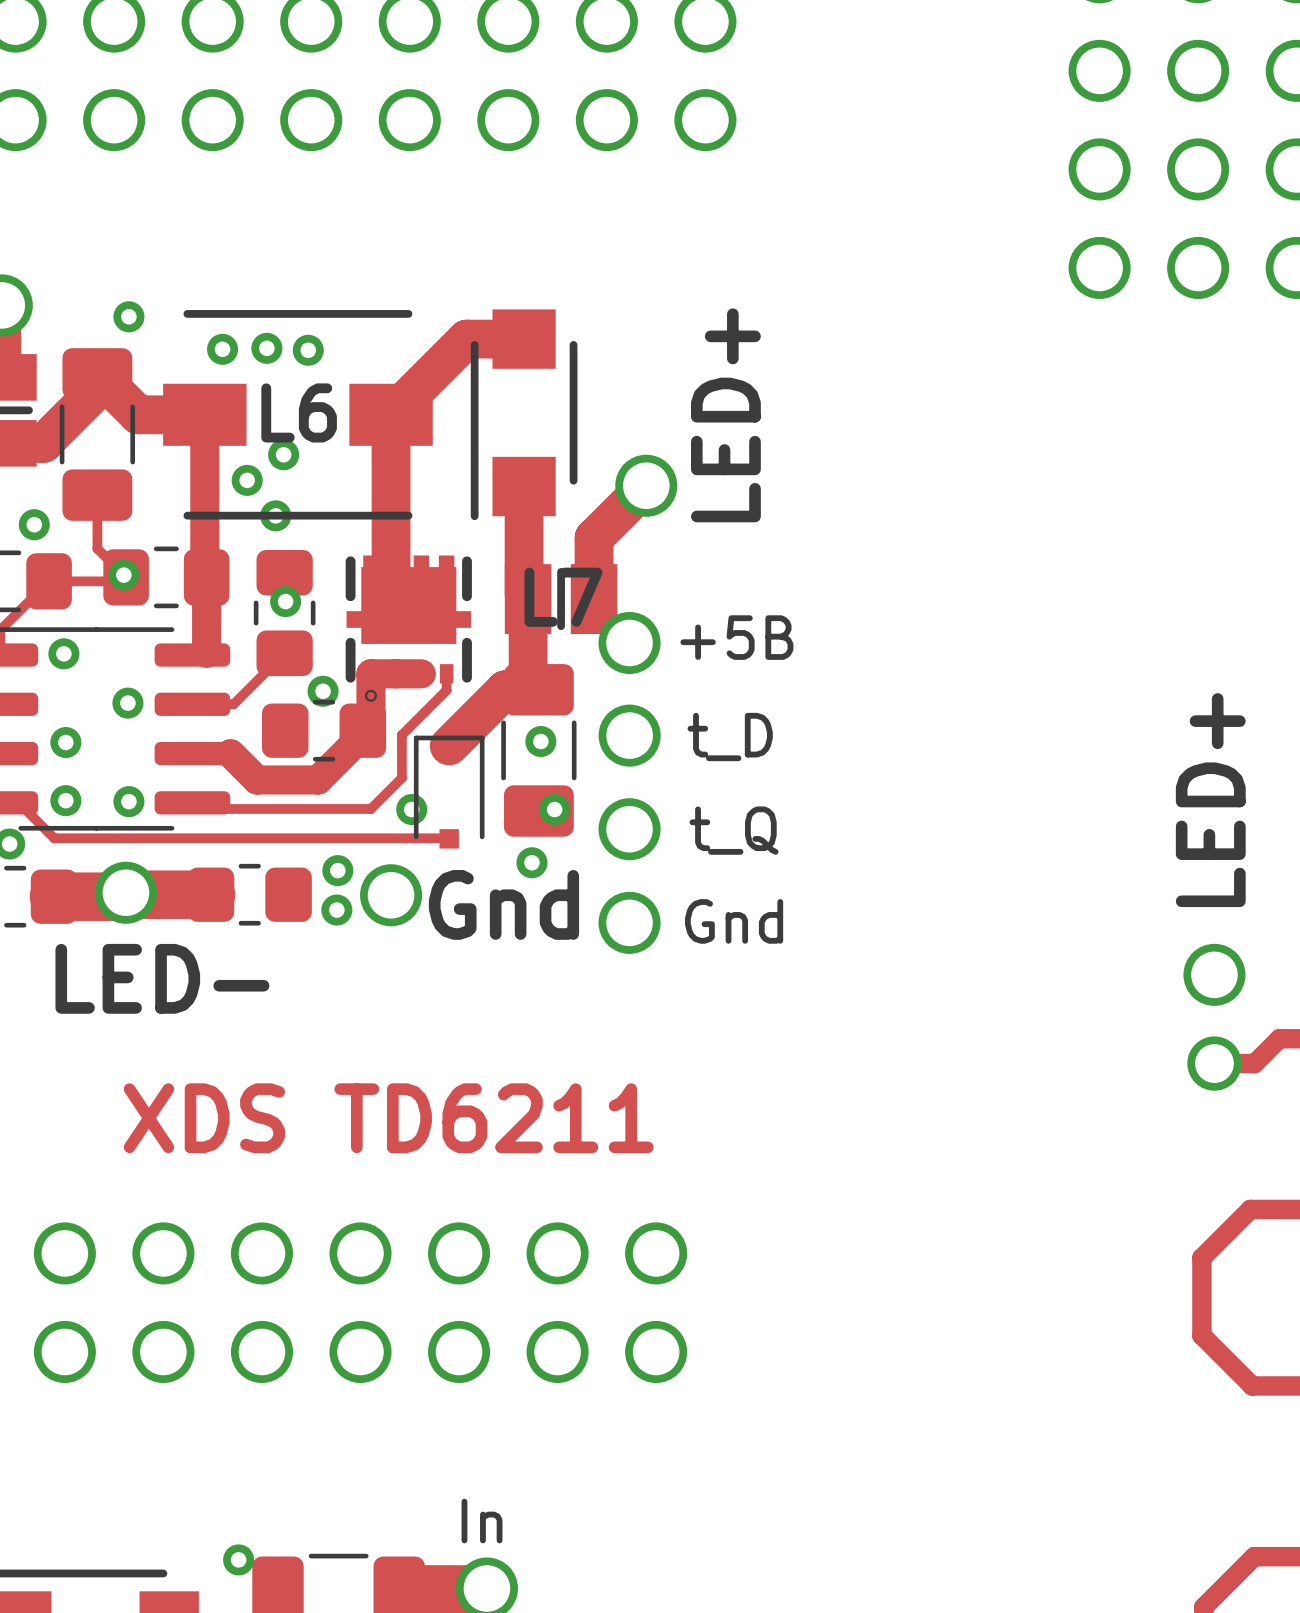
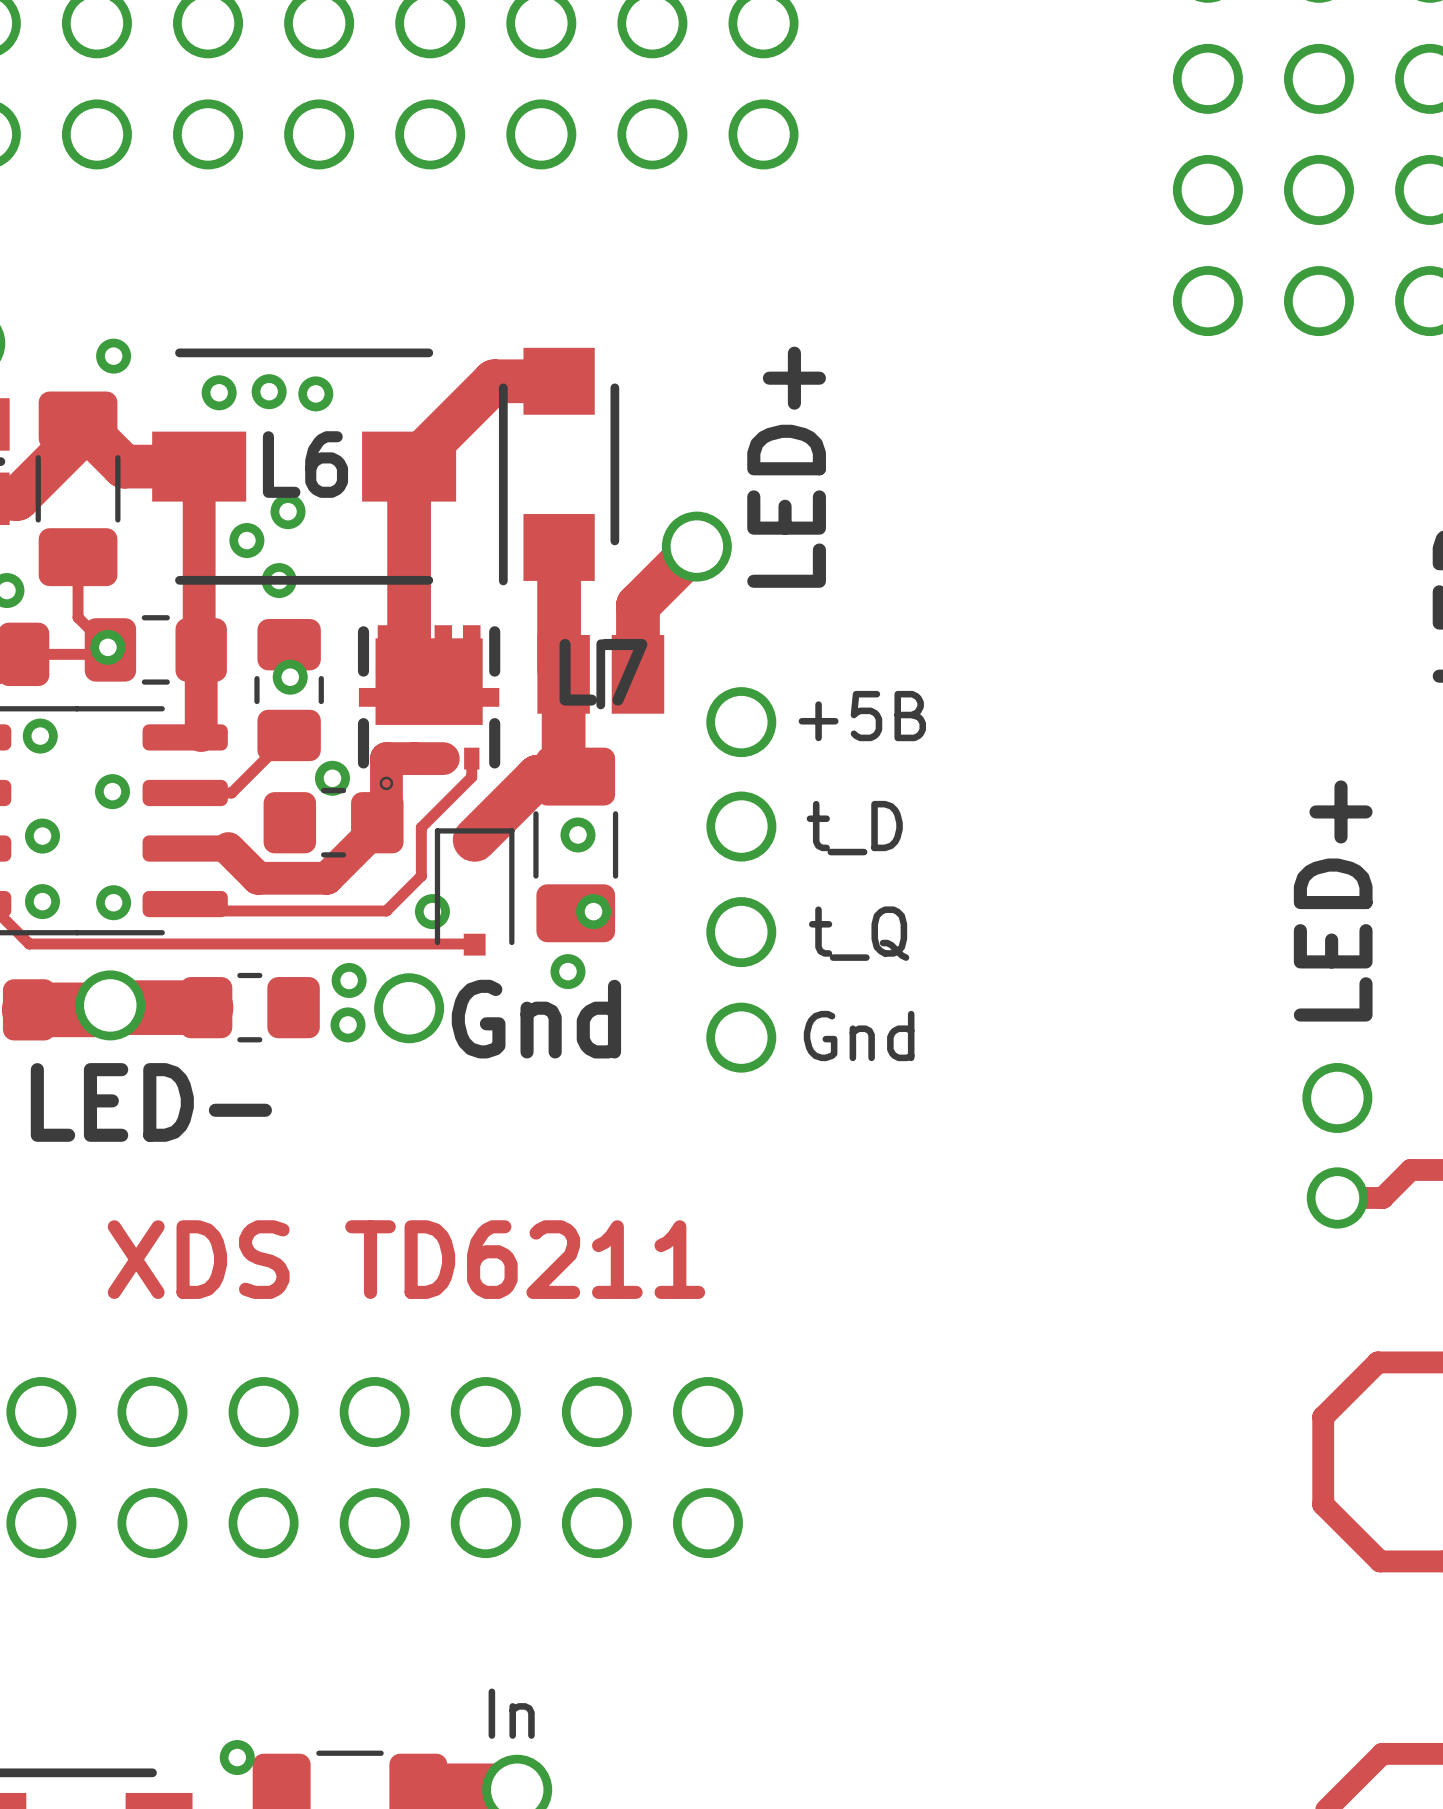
part position: (629, 642) -> (741, 722)
part position: (629, 735) -> (741, 826)
part position: (629, 829) -> (741, 932)
part position: (629, 922) -> (741, 1037)

